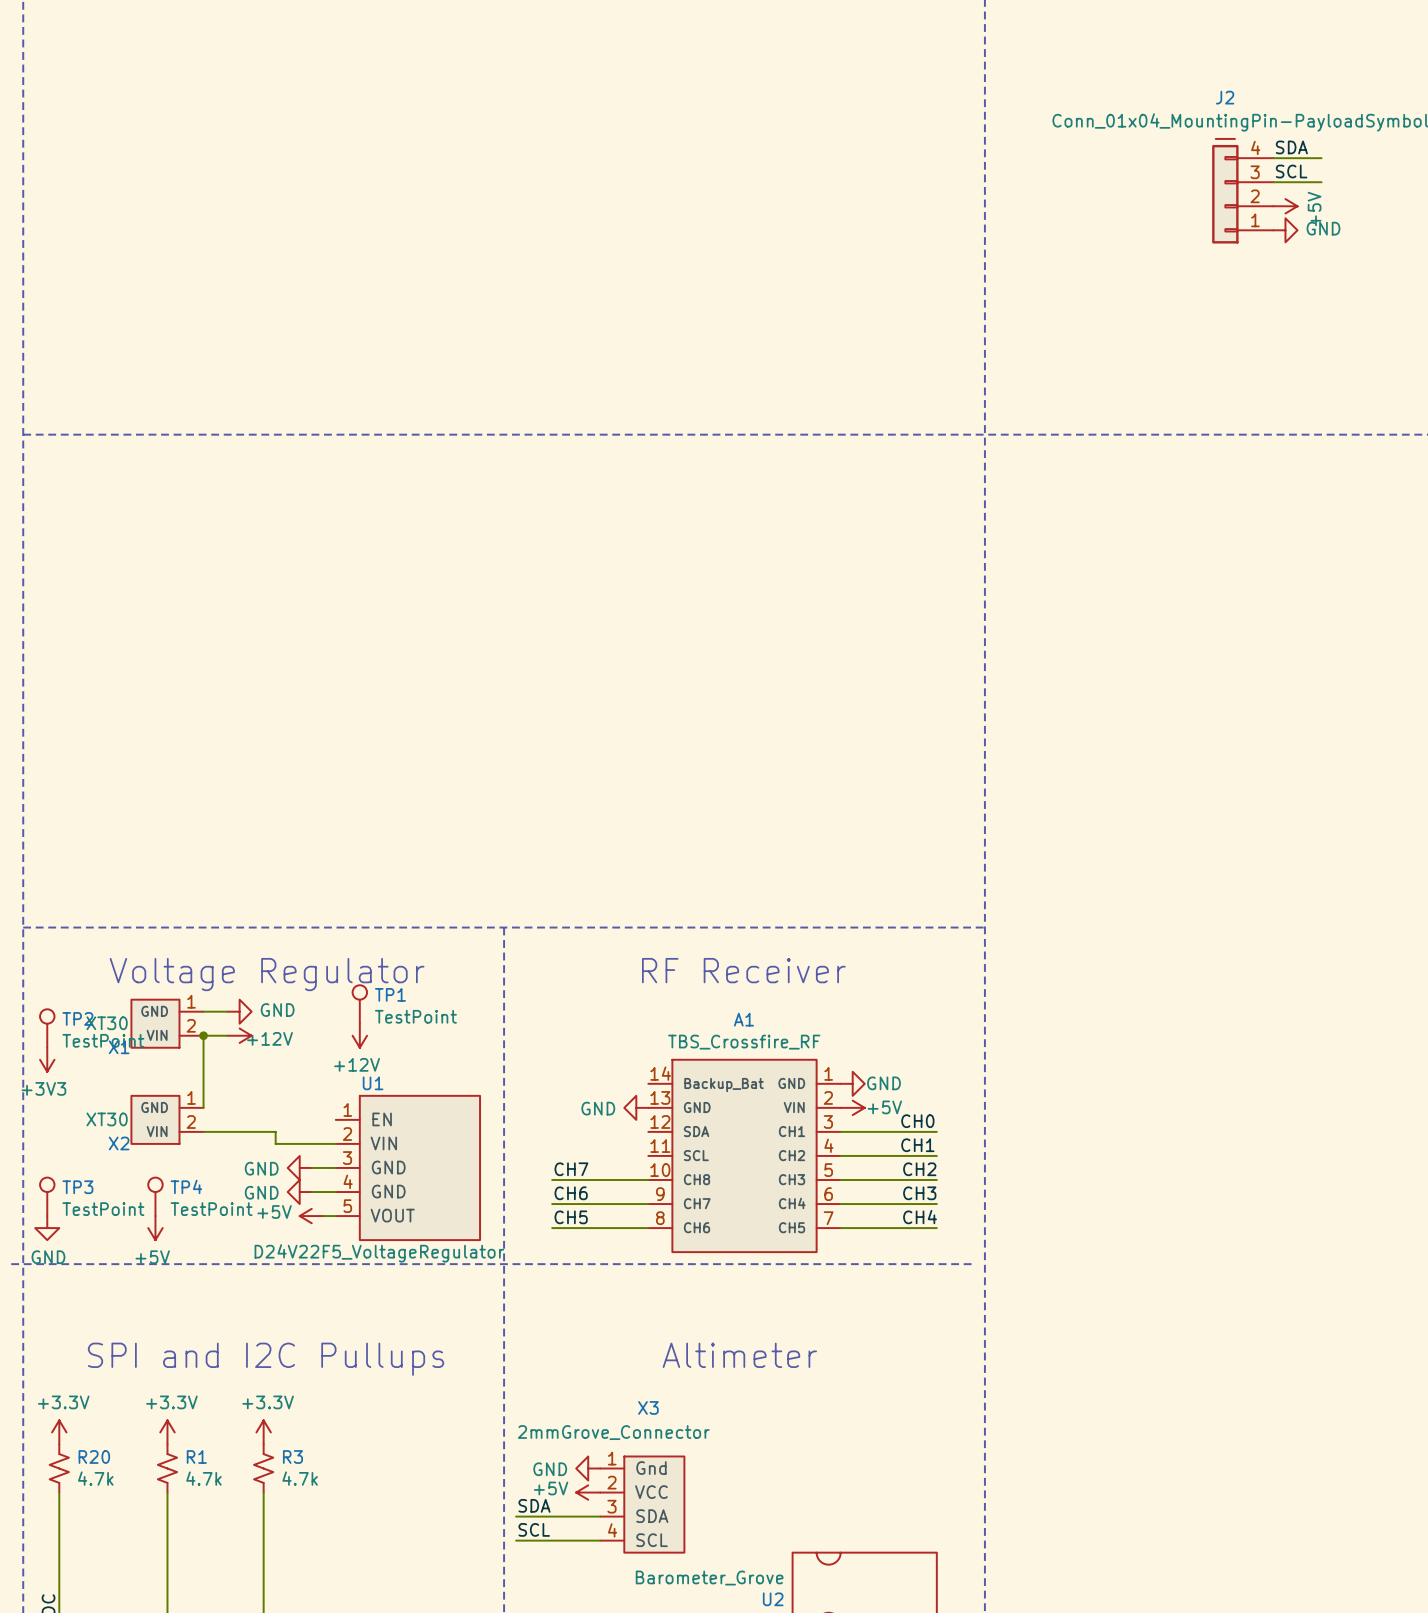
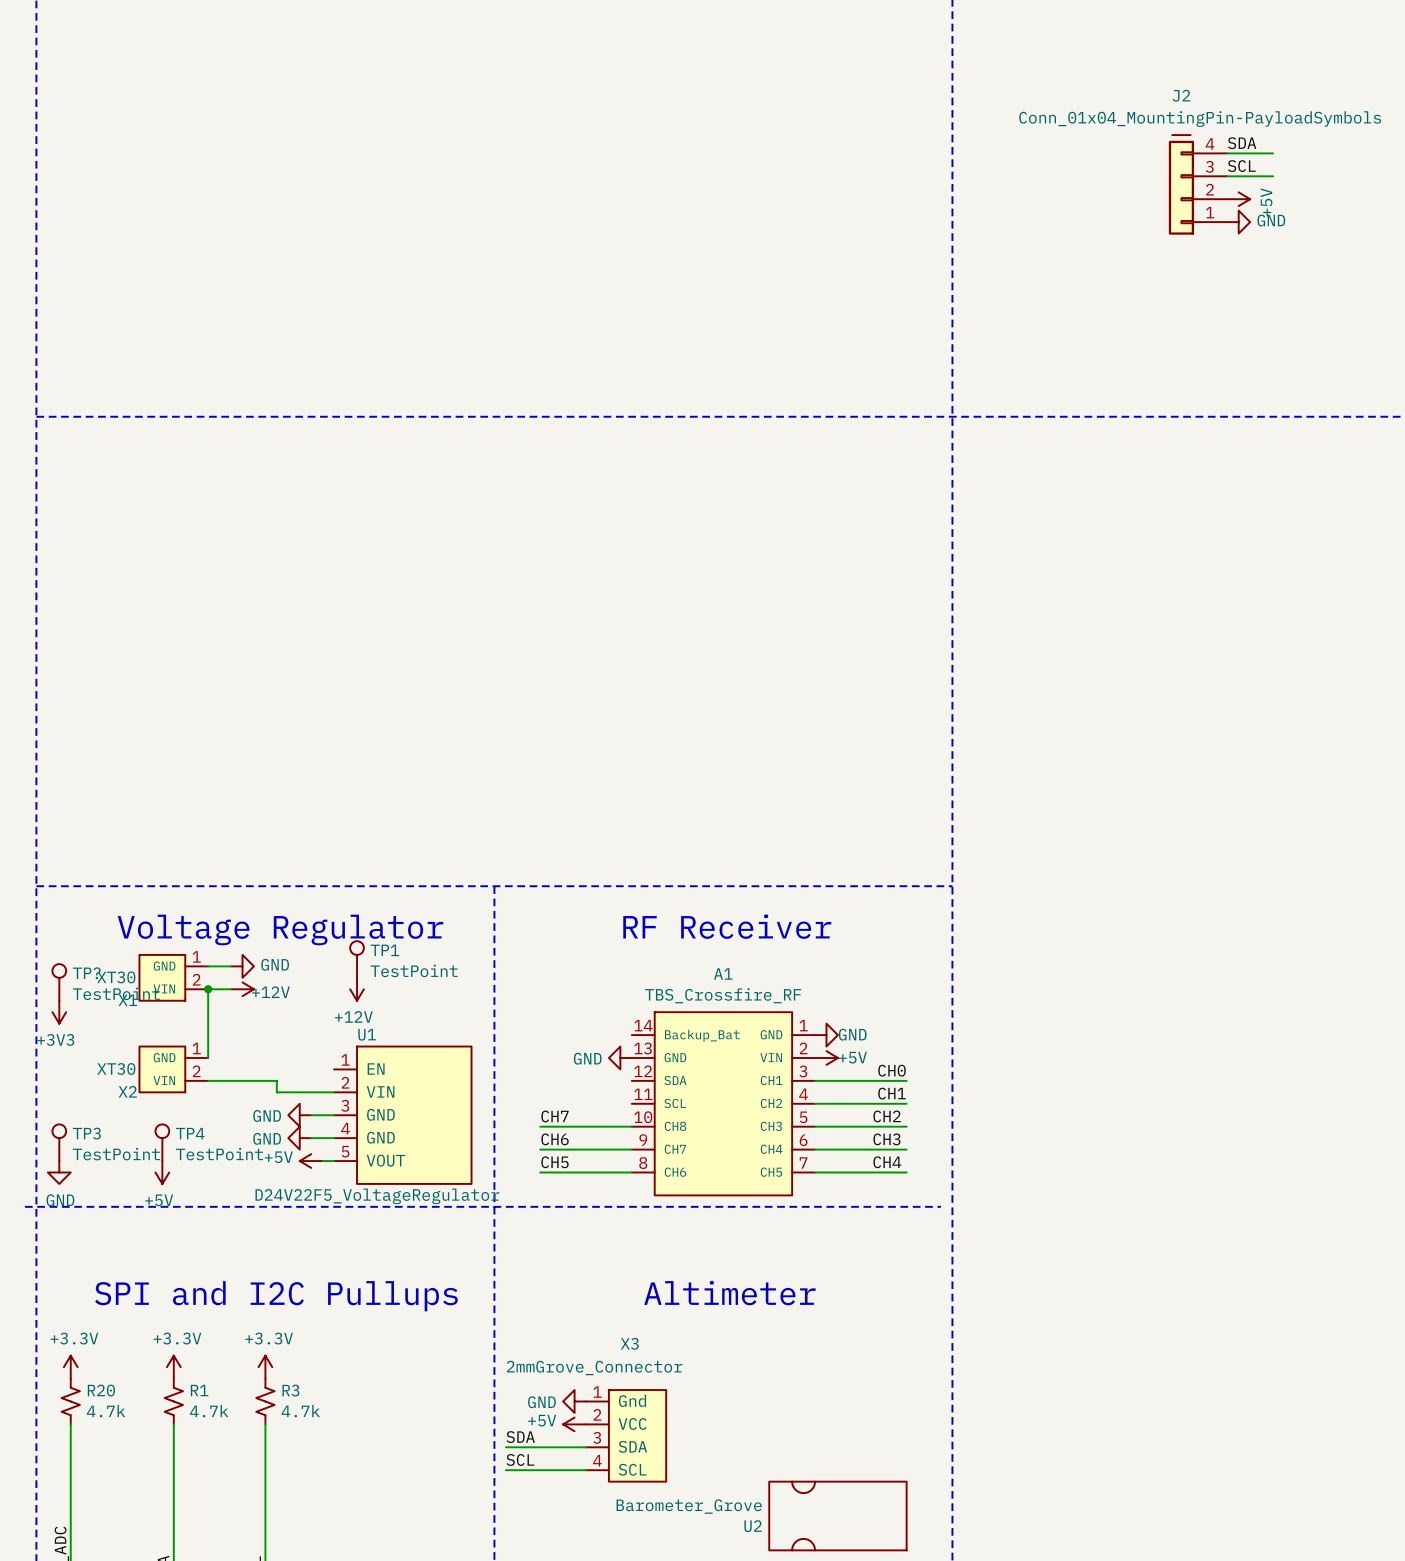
TP2 name: TP2 (77, 1018) -> TP? (86, 973)

